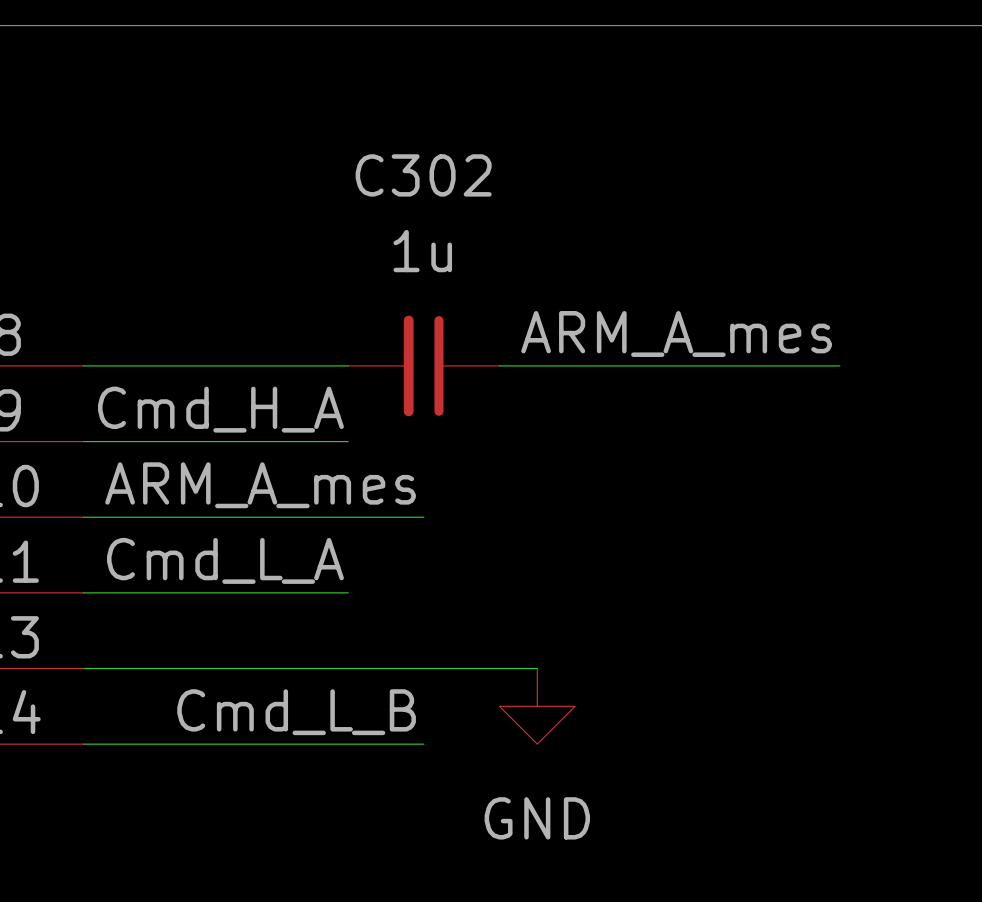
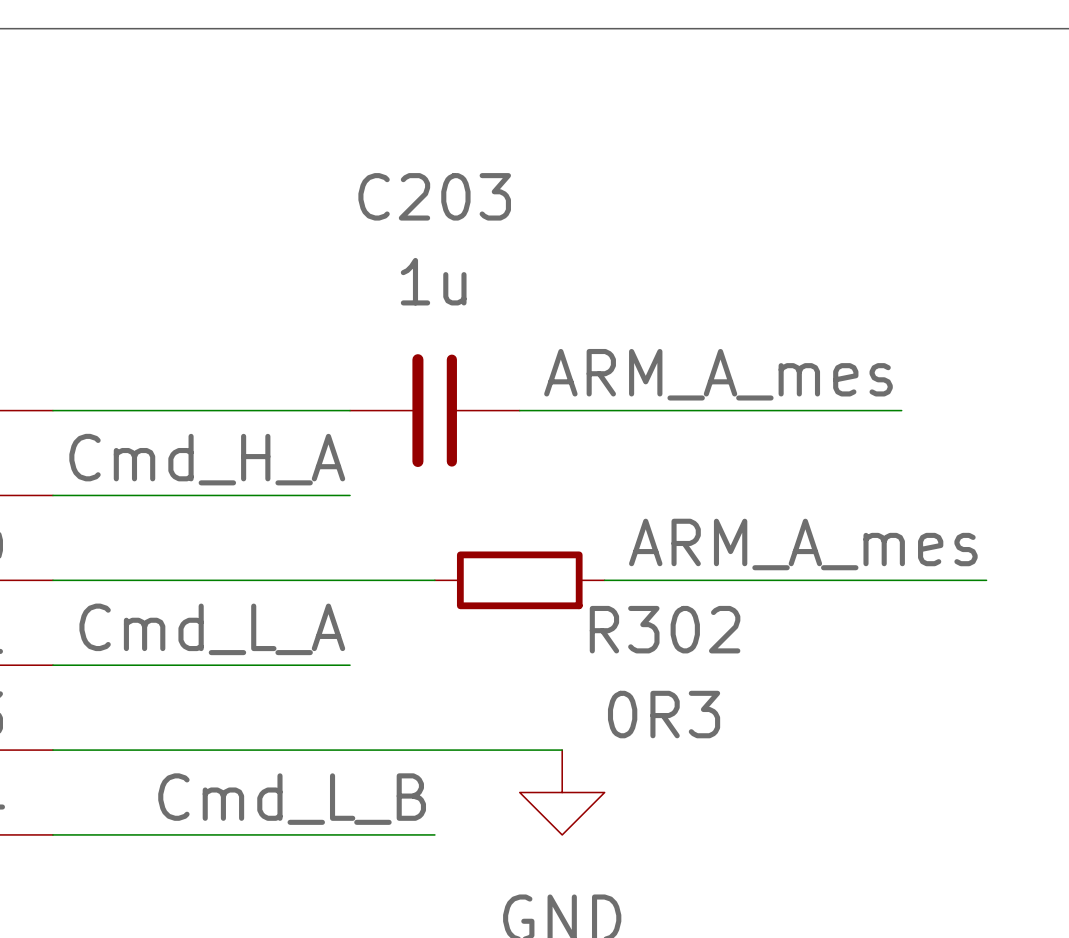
C302 name: C302 (423, 175) -> C203 (434, 196)
label position: ARM_A_mes (260, 485) -> ARM_A_mes (803, 544)
R302: none -> 0R3 (519, 580)
wire: none -> (604, 580) (986, 580)

